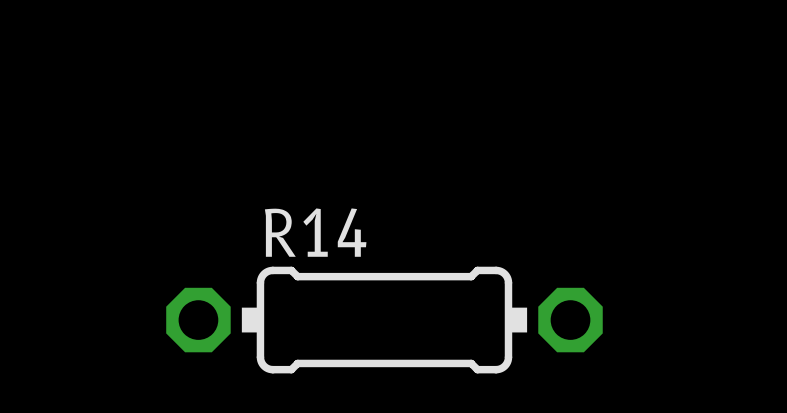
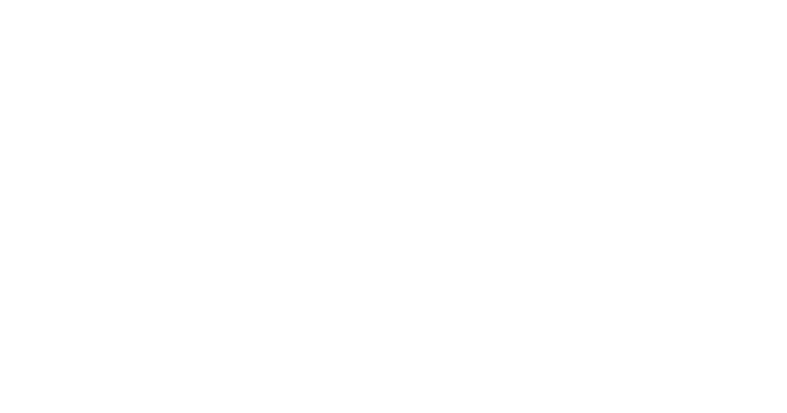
R14: (384, 320) -> none

